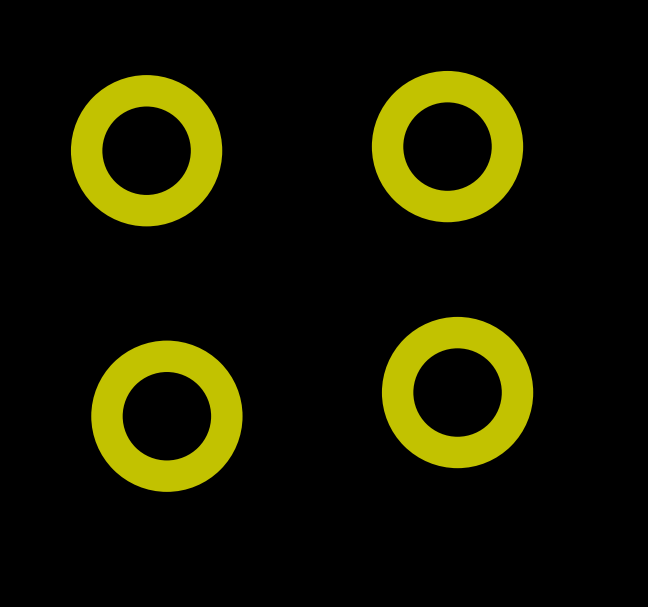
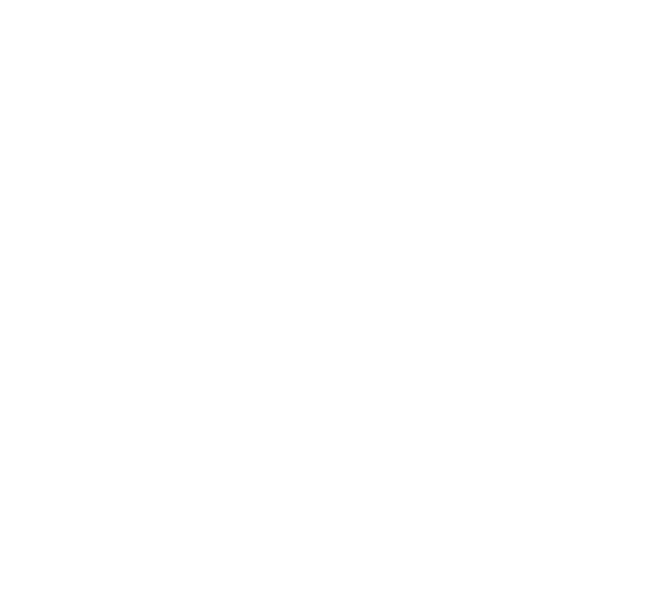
part: (447, 146) -> none
part: (146, 150) -> none
part: (457, 392) -> none
part: (166, 416) -> none

